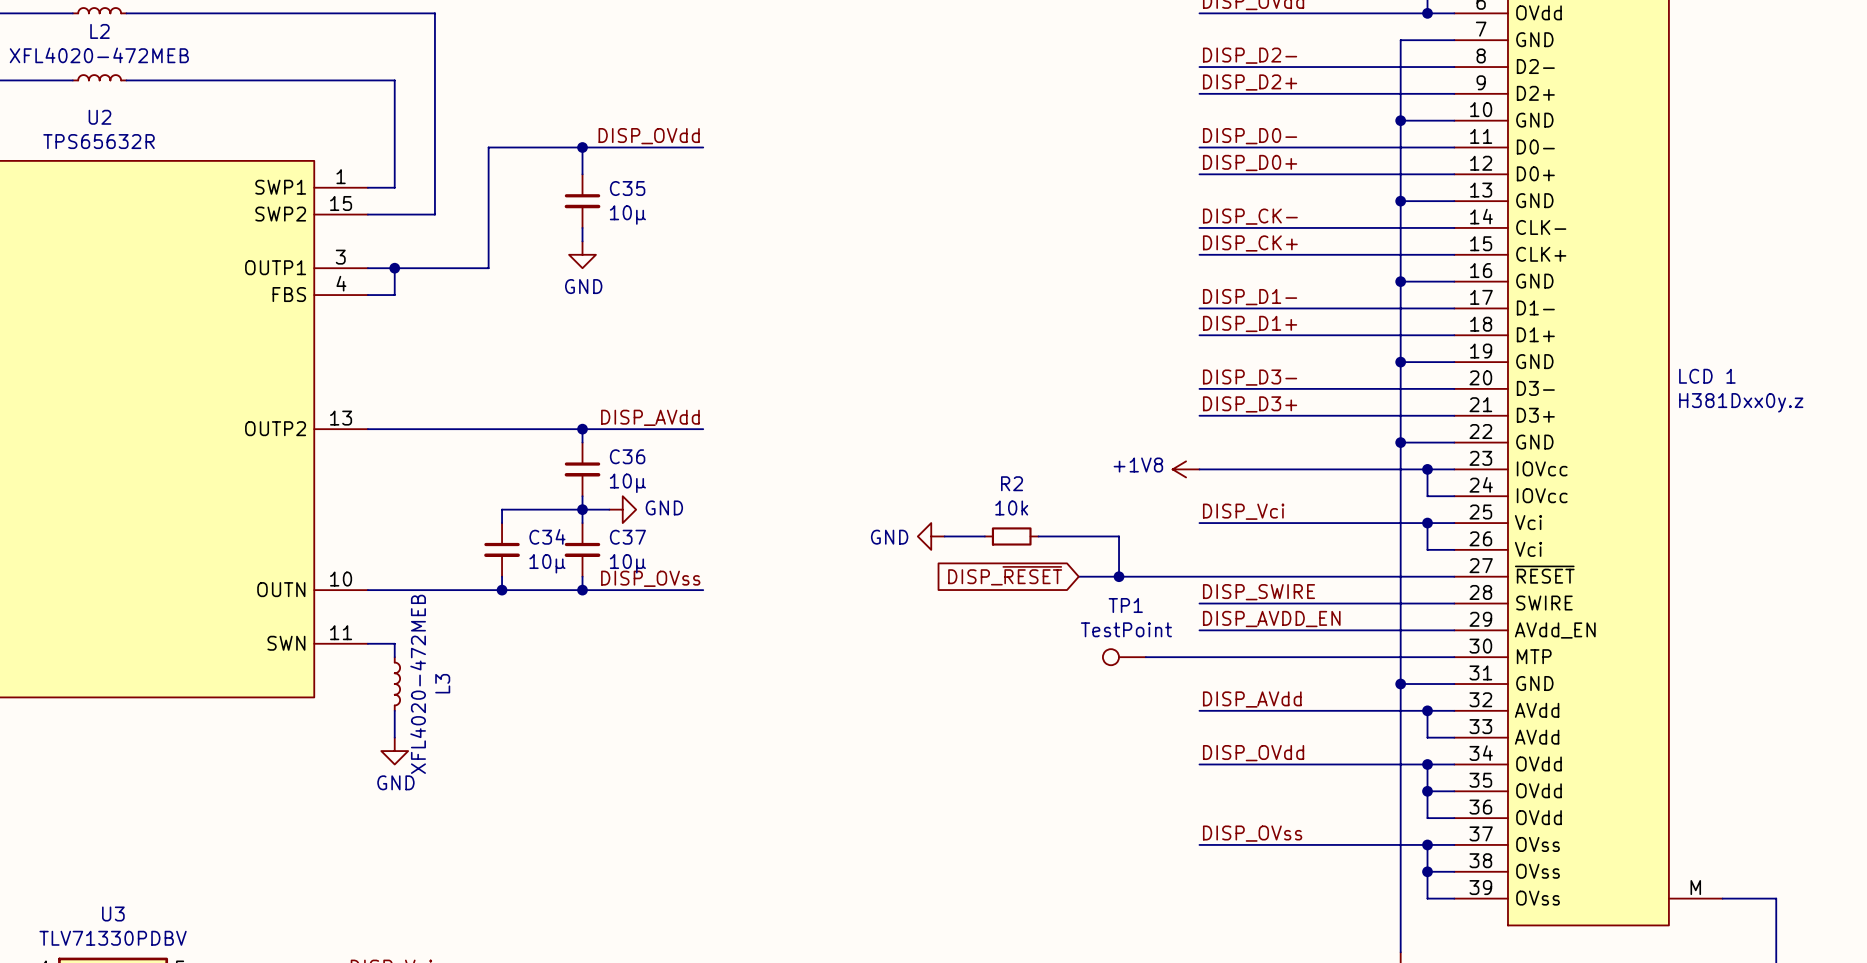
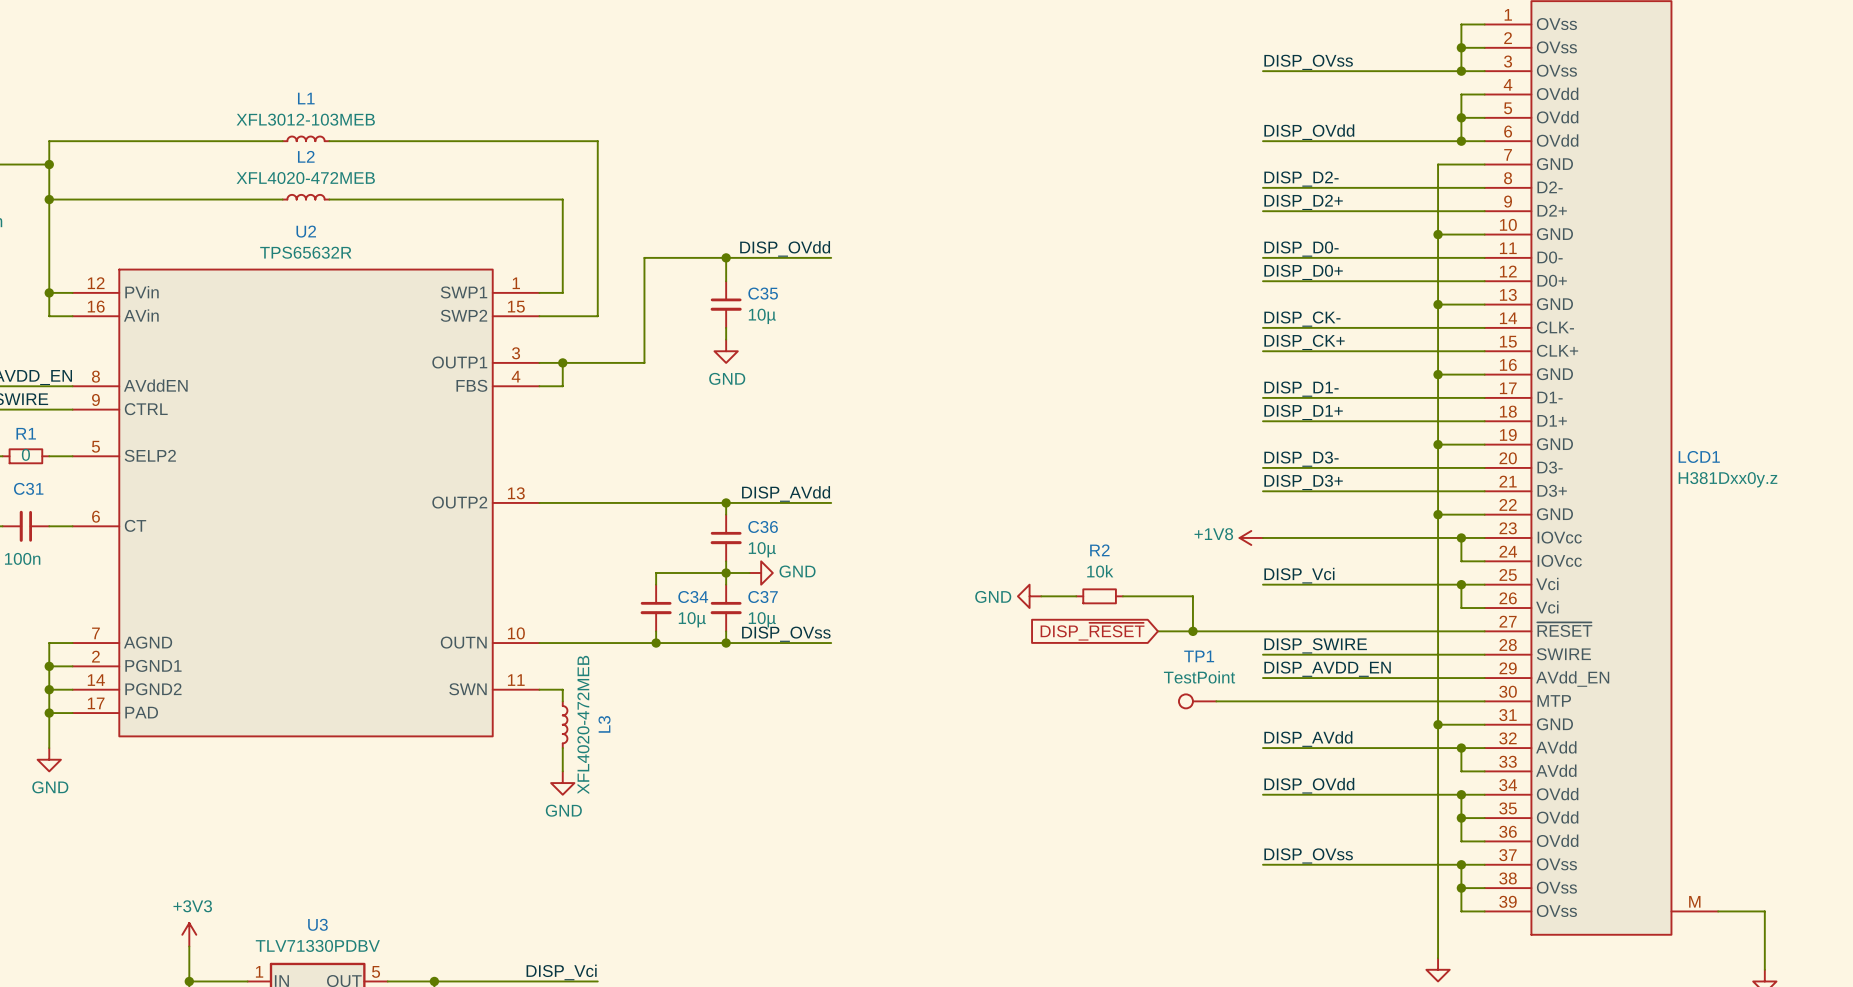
LCD 1 name: LCD 1 (1707, 376) -> LCD1 (1699, 456)

